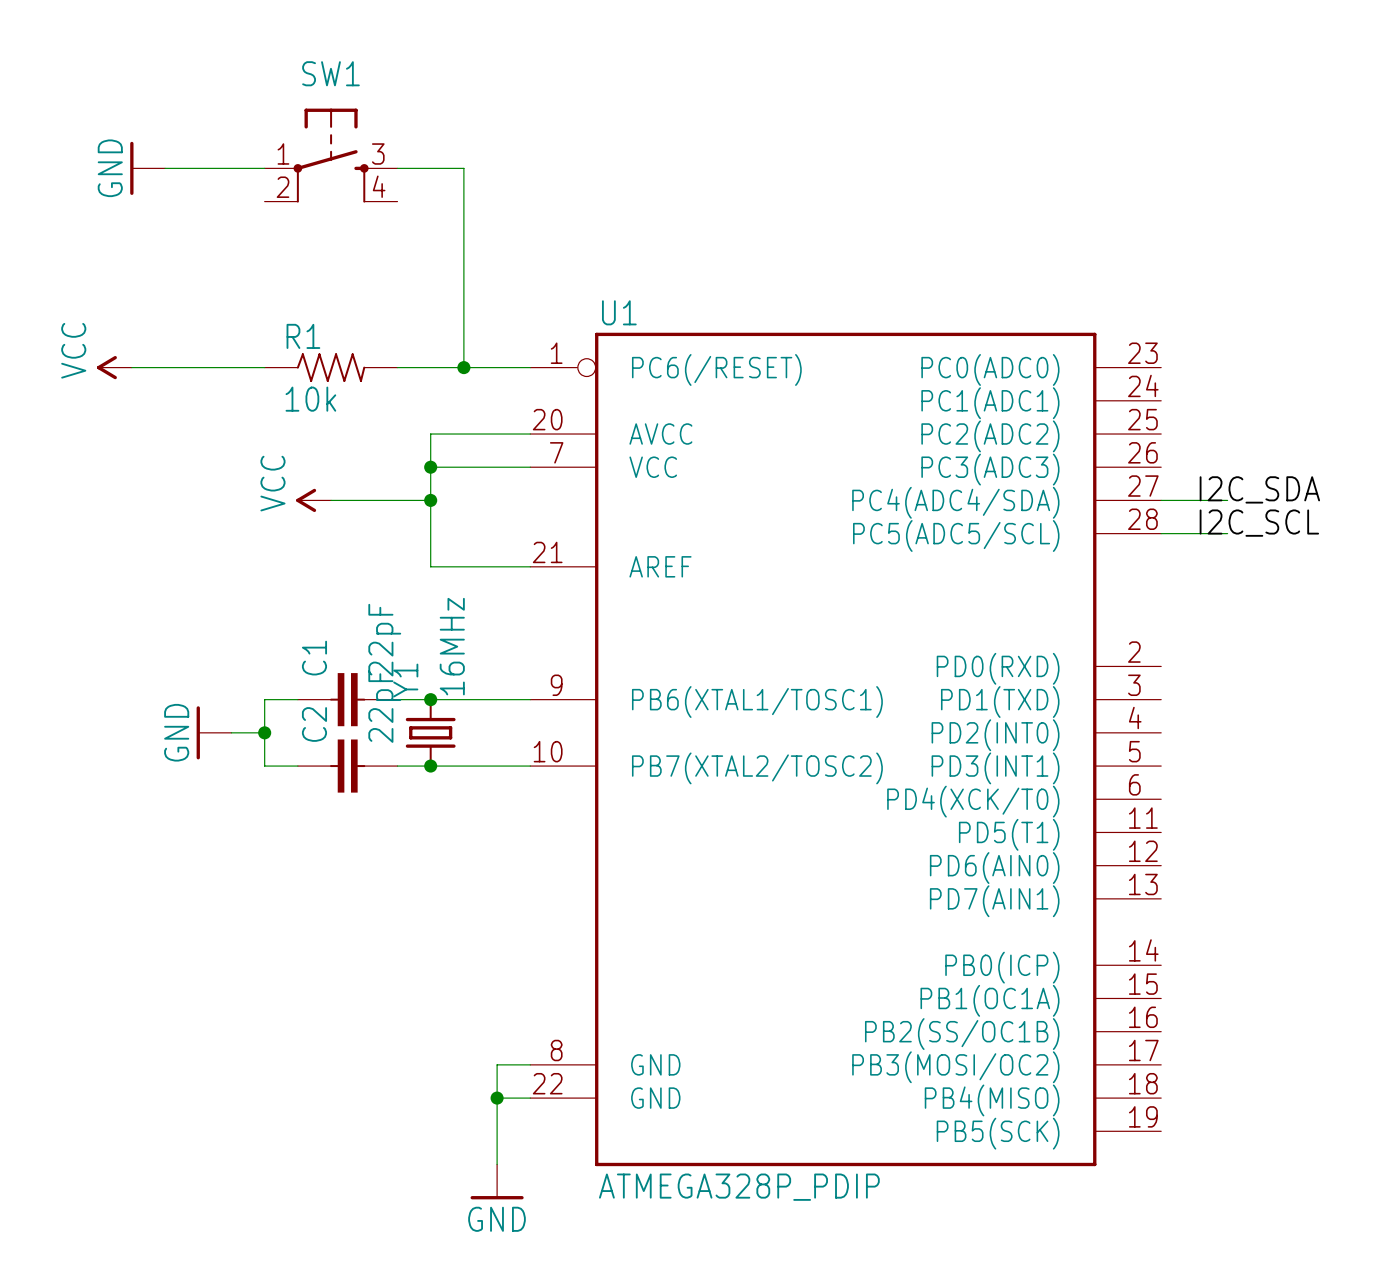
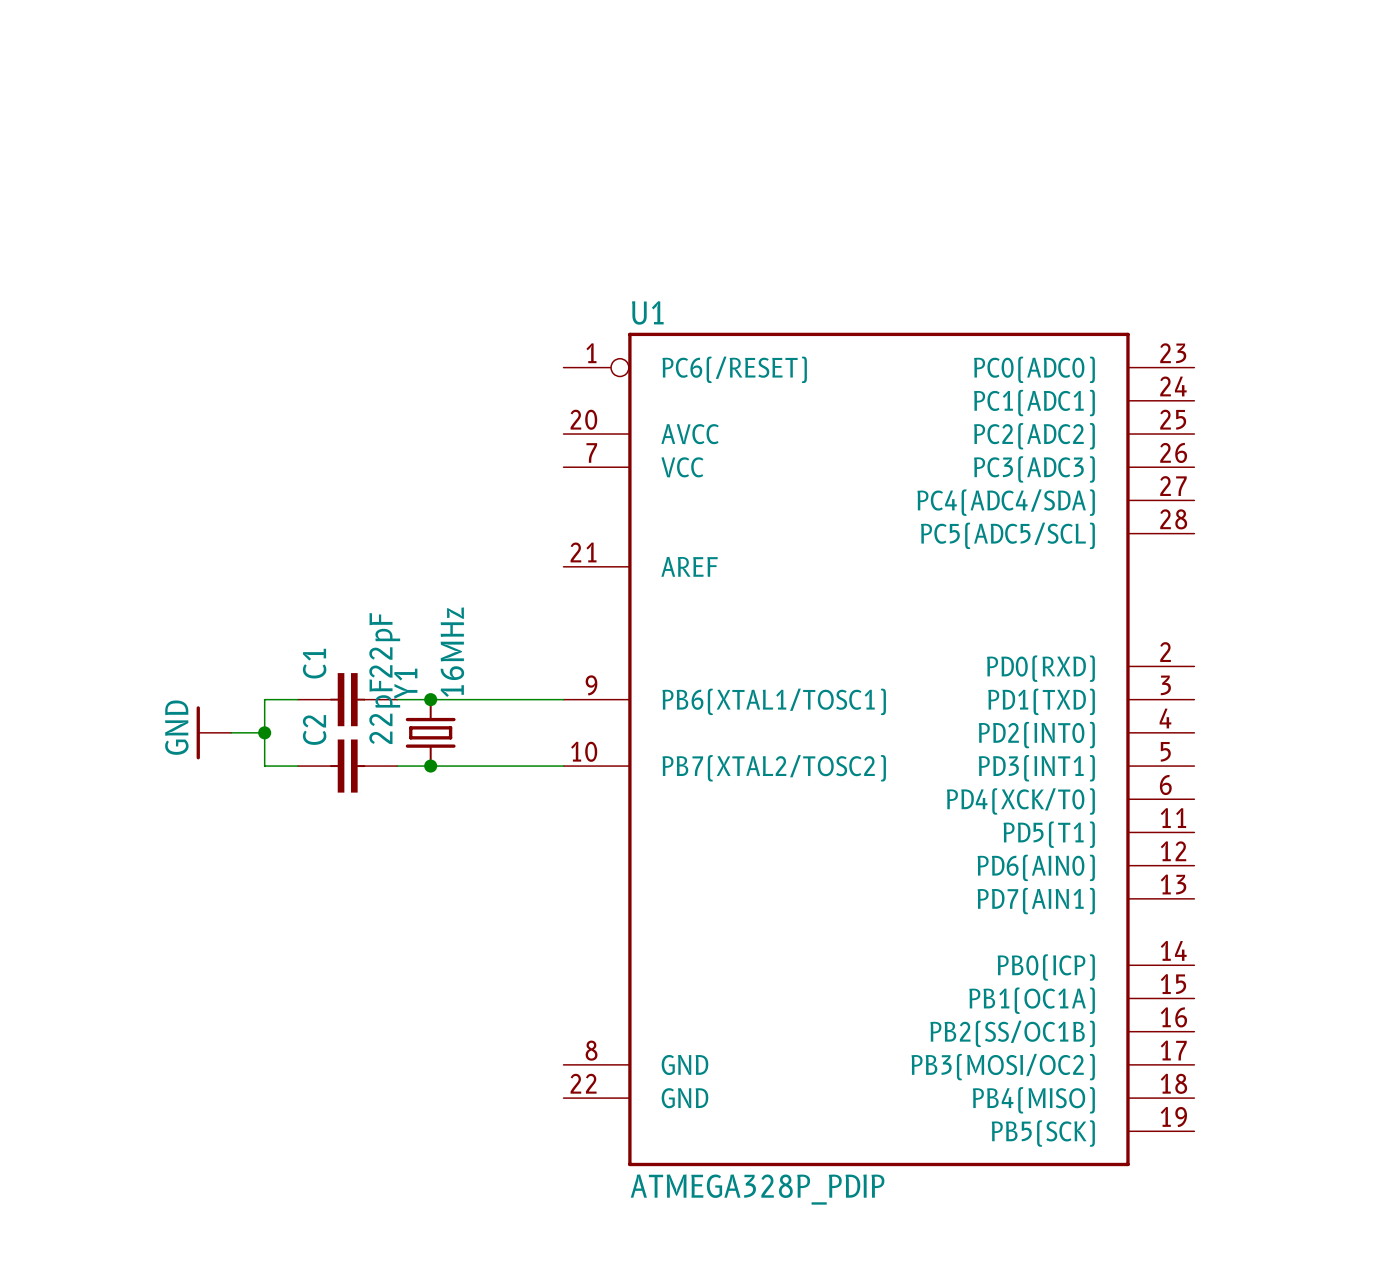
SW1: (331, 155) -> none
power symbol: GND (147, 168) -> none
wire: (165, 168) (264, 168) -> none
wire: (397, 168) (463, 168) (463, 367) -> none
power symbol: VCC (114, 367) -> none
wire: (131, 367) (264, 367) -> none
R1: 10k (331, 367) -> none
wire: (397, 367) (530, 367) -> none
junction: (463, 367) -> none
wire: (530, 434) (430, 434) (430, 566) (530, 566) -> none
wire: (430, 467) (530, 467) -> none
junction: (430, 467) -> none
label: I2C_SDA (1259, 489) -> none
power symbol: VCC (313, 500) -> none
wire: (331, 500) (430, 500) -> none
junction: (430, 500) -> none
wire: (1161, 500) (1227, 500) -> none
label: I2C_SCL (1259, 523) -> none
wire: (1161, 533) (1227, 533) -> none
U1 position: (845, 749) -> (878, 749)
wire: (530, 1064) (497, 1064) (497, 1164) -> none
wire: (497, 1098) (530, 1098) -> none
junction: (497, 1098) -> none
power symbol: GND (497, 1181) -> none

